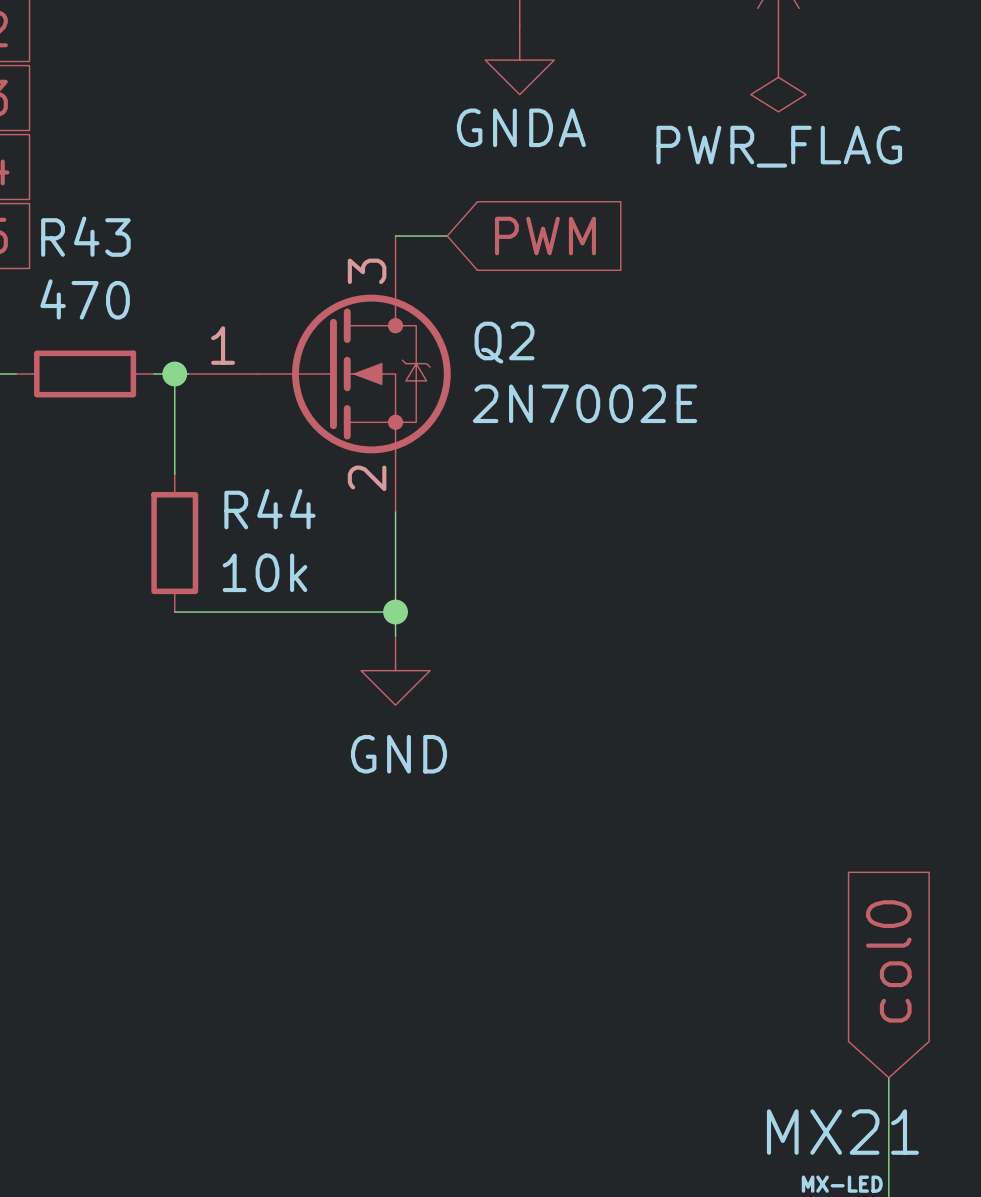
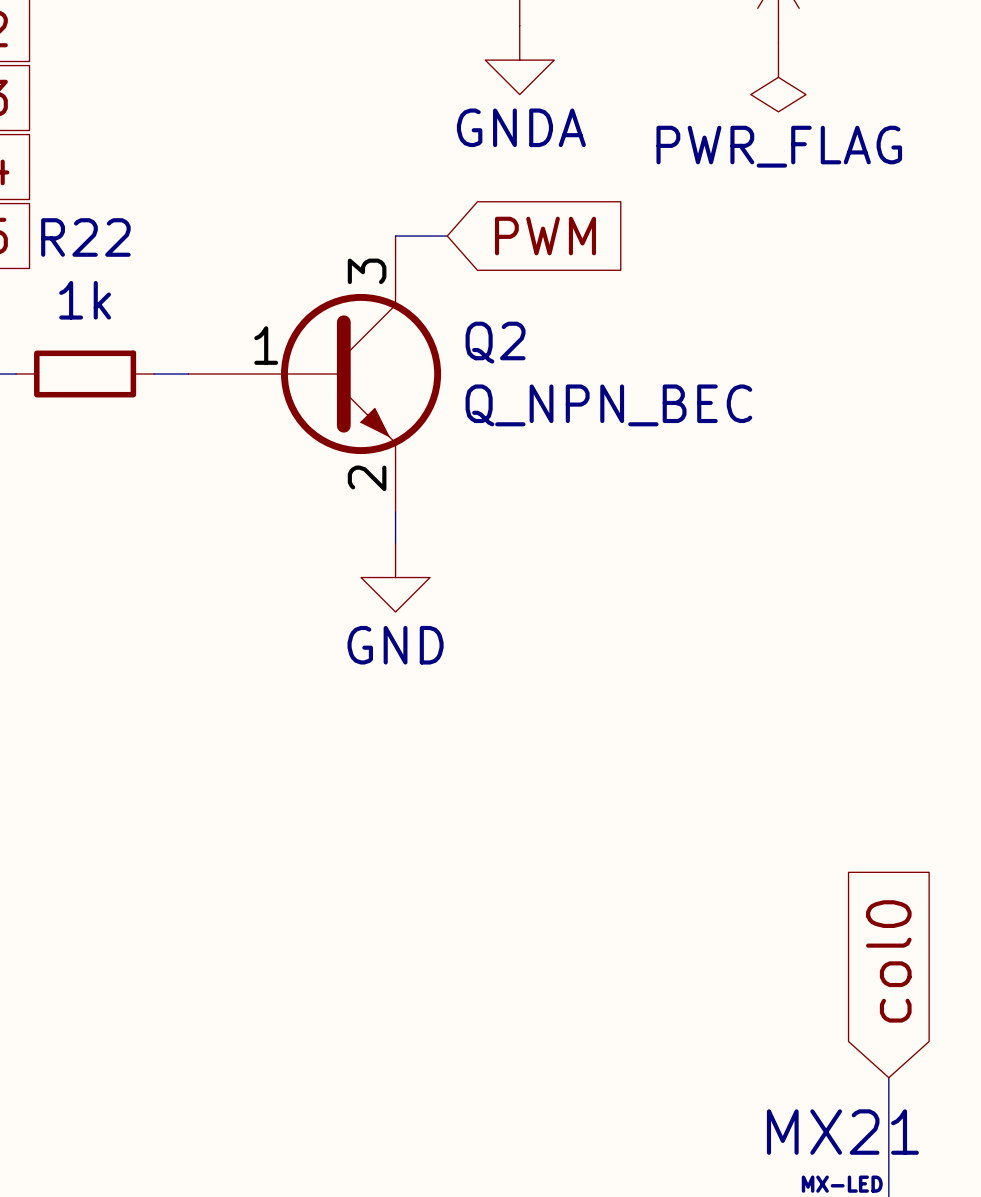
R43 name: R43 (85, 236) -> R22 (85, 237)
Q2 symbol: [188, 236, 451, 512] -> [188, 236, 442, 512]
R43 value: 470 (85, 299) -> 1k (85, 300)
wire: (174, 374) (174, 474) -> none
junction: (174, 374) -> none
Q2 value: 2N7002E (585, 403) -> Q_NPN_BEC (608, 405)
R44: 10k (174, 543) -> none
wire: (395, 543) (395, 636) -> none
wire: (174, 612) (395, 612) -> none
junction: (395, 612) -> none
power symbol position: GND (395, 670) -> GND (395, 577)
power symbol text position: GND (399, 754) -> GND (395, 645)

